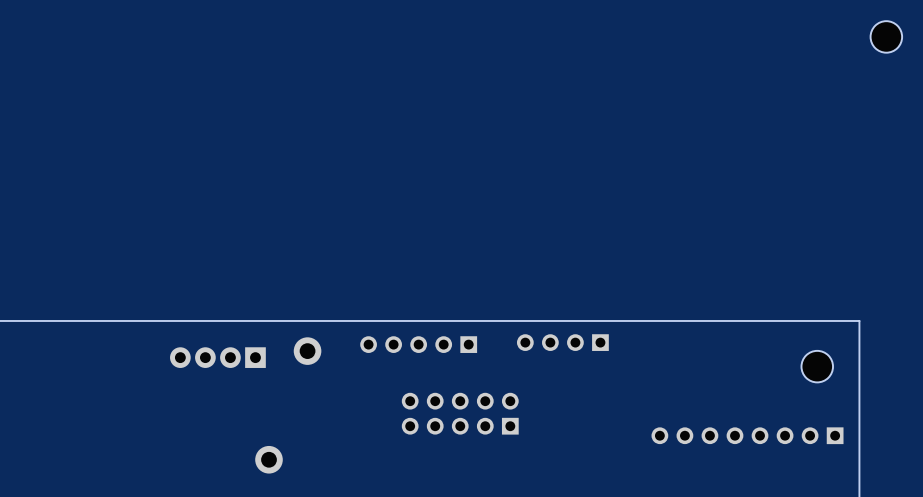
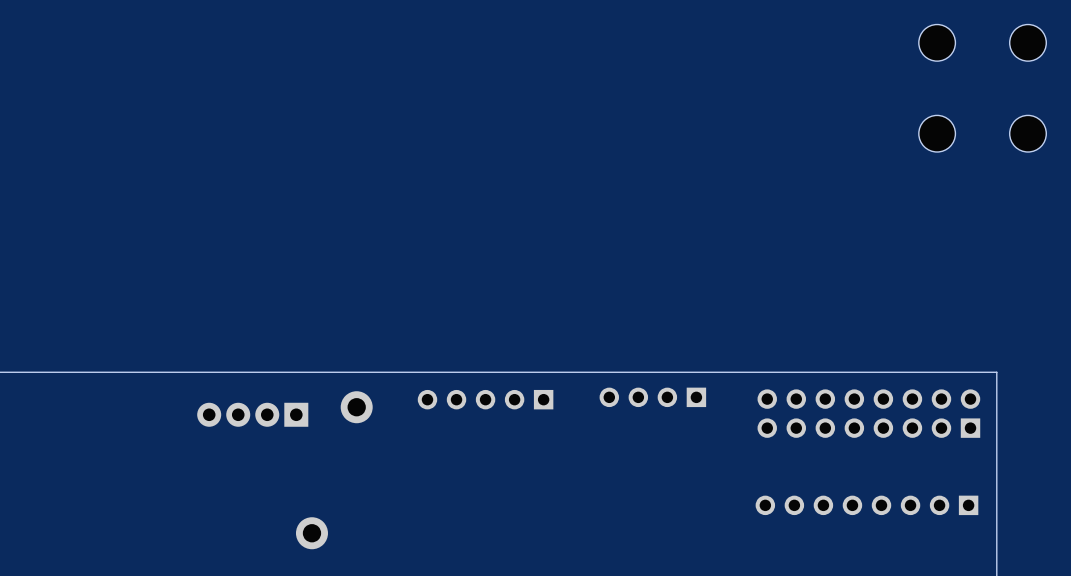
part: none -> (937, 42)
part: none -> (937, 133)
part: none -> (1028, 133)
part: none -> (868, 413)
part: (817, 366) -> none
part: (460, 413) -> none

